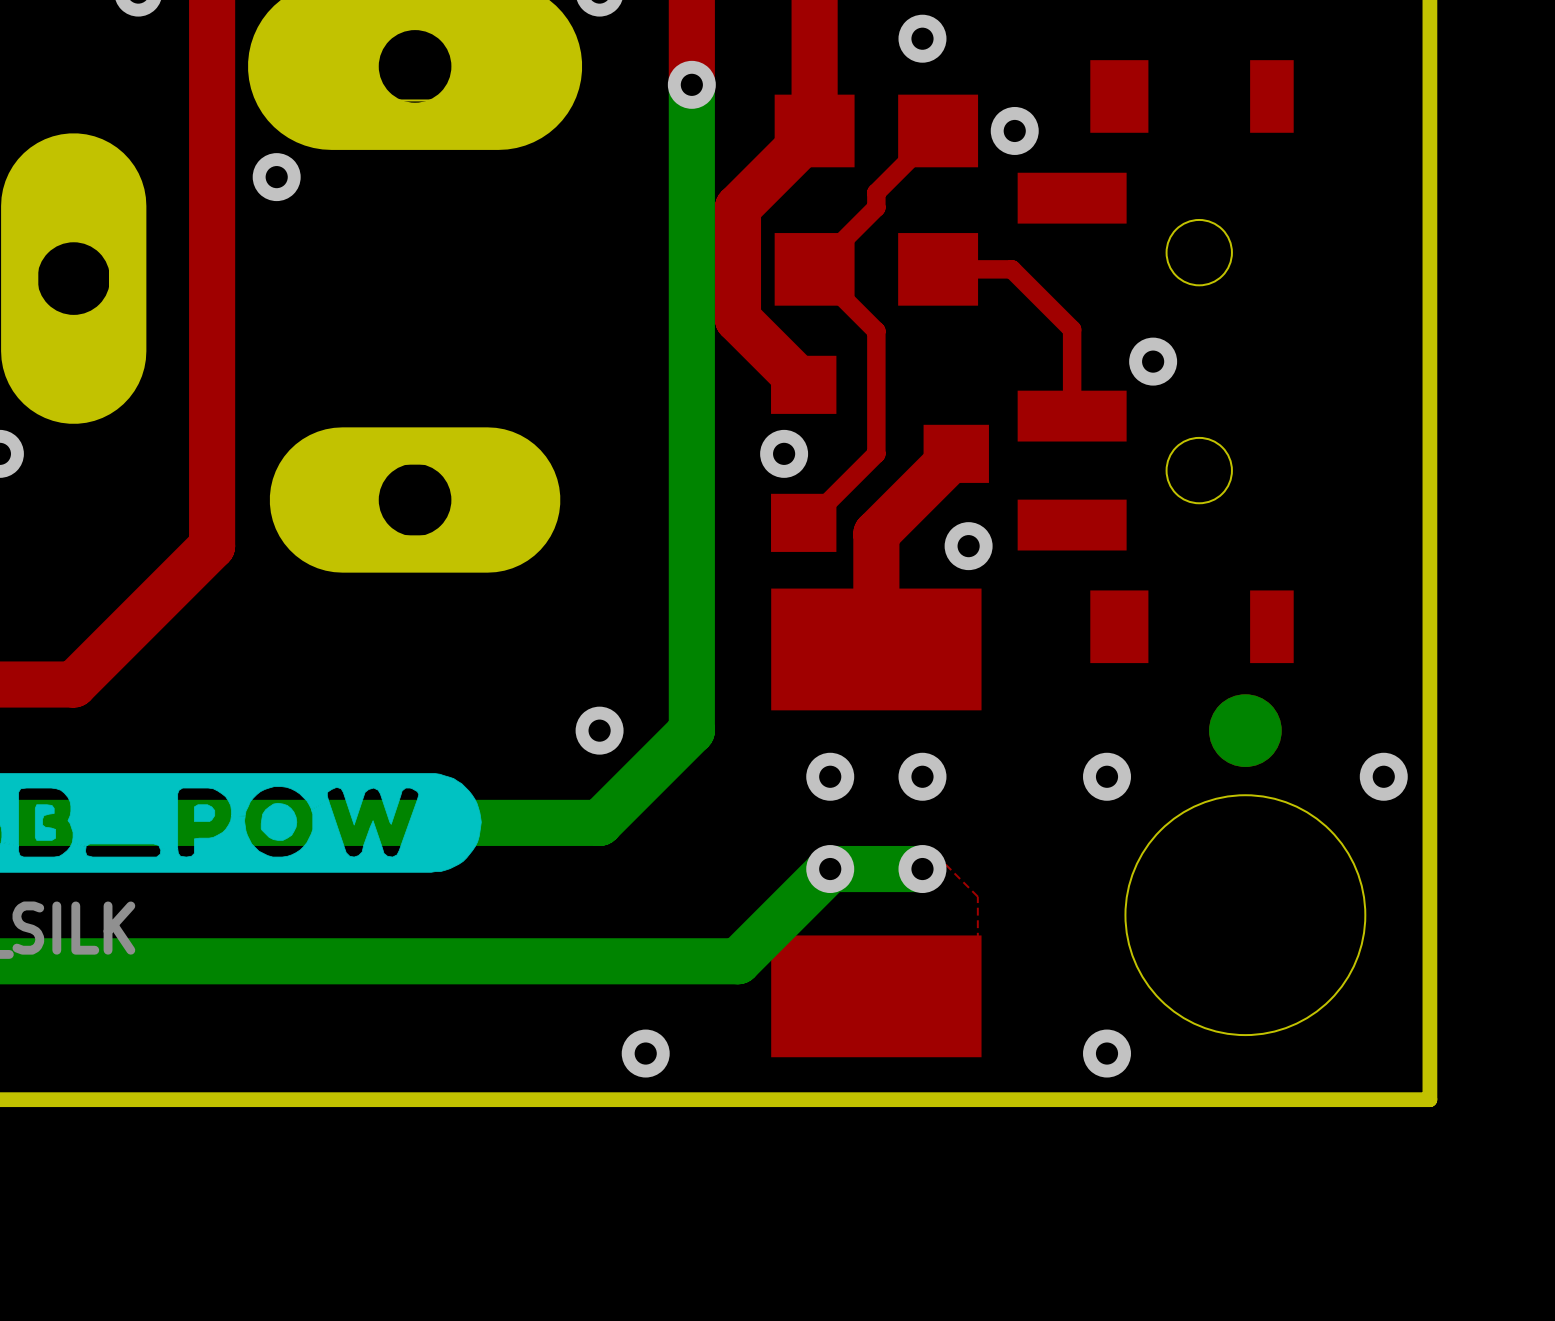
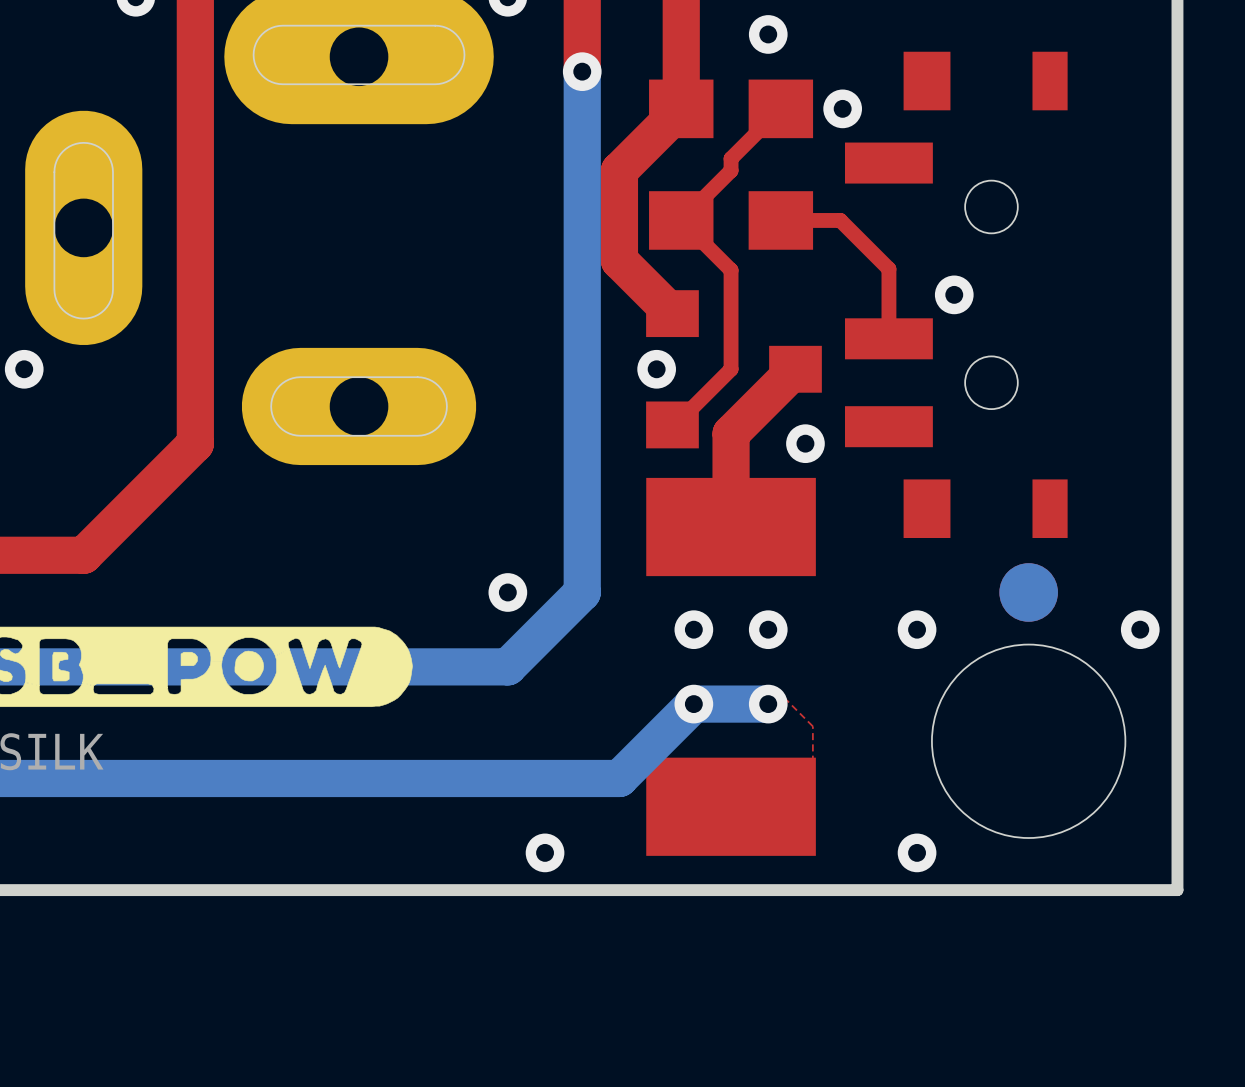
via: (276, 177) -> none

